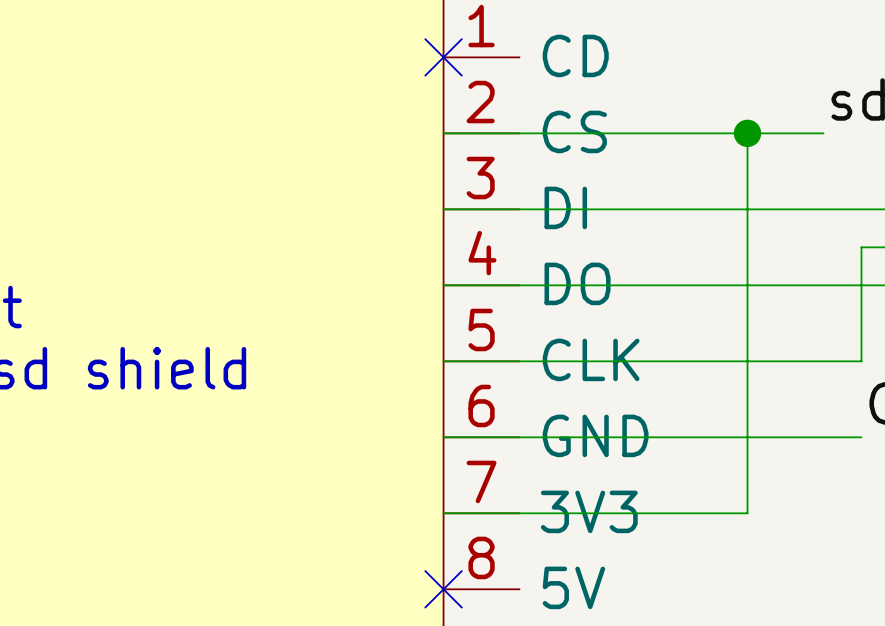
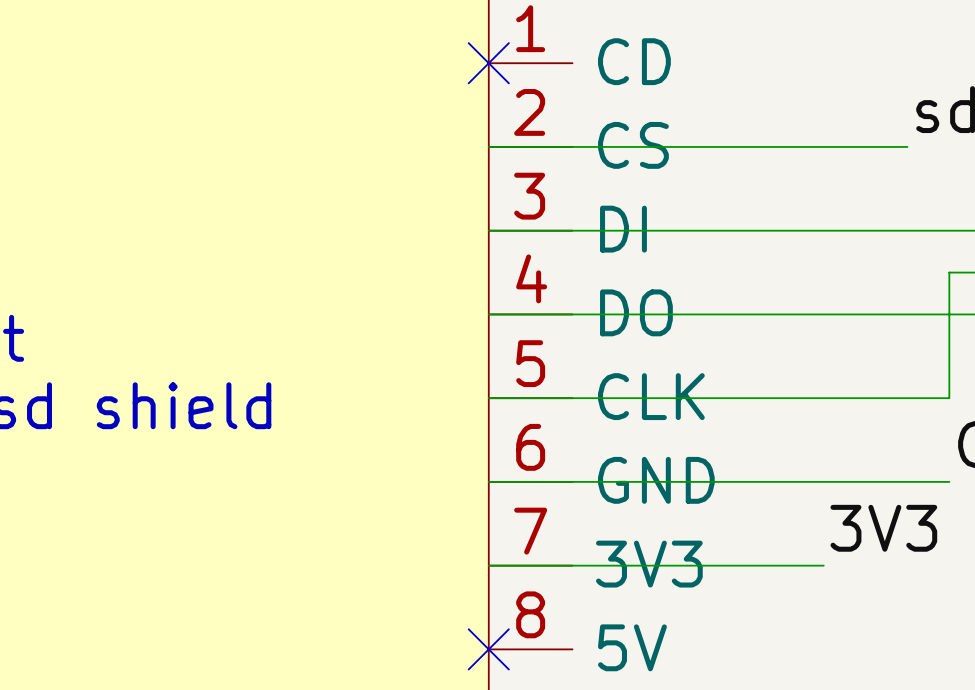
wire: (747, 133) (747, 513) -> none
junction: (747, 133) -> none
label: none -> 3V3 (883, 528)

